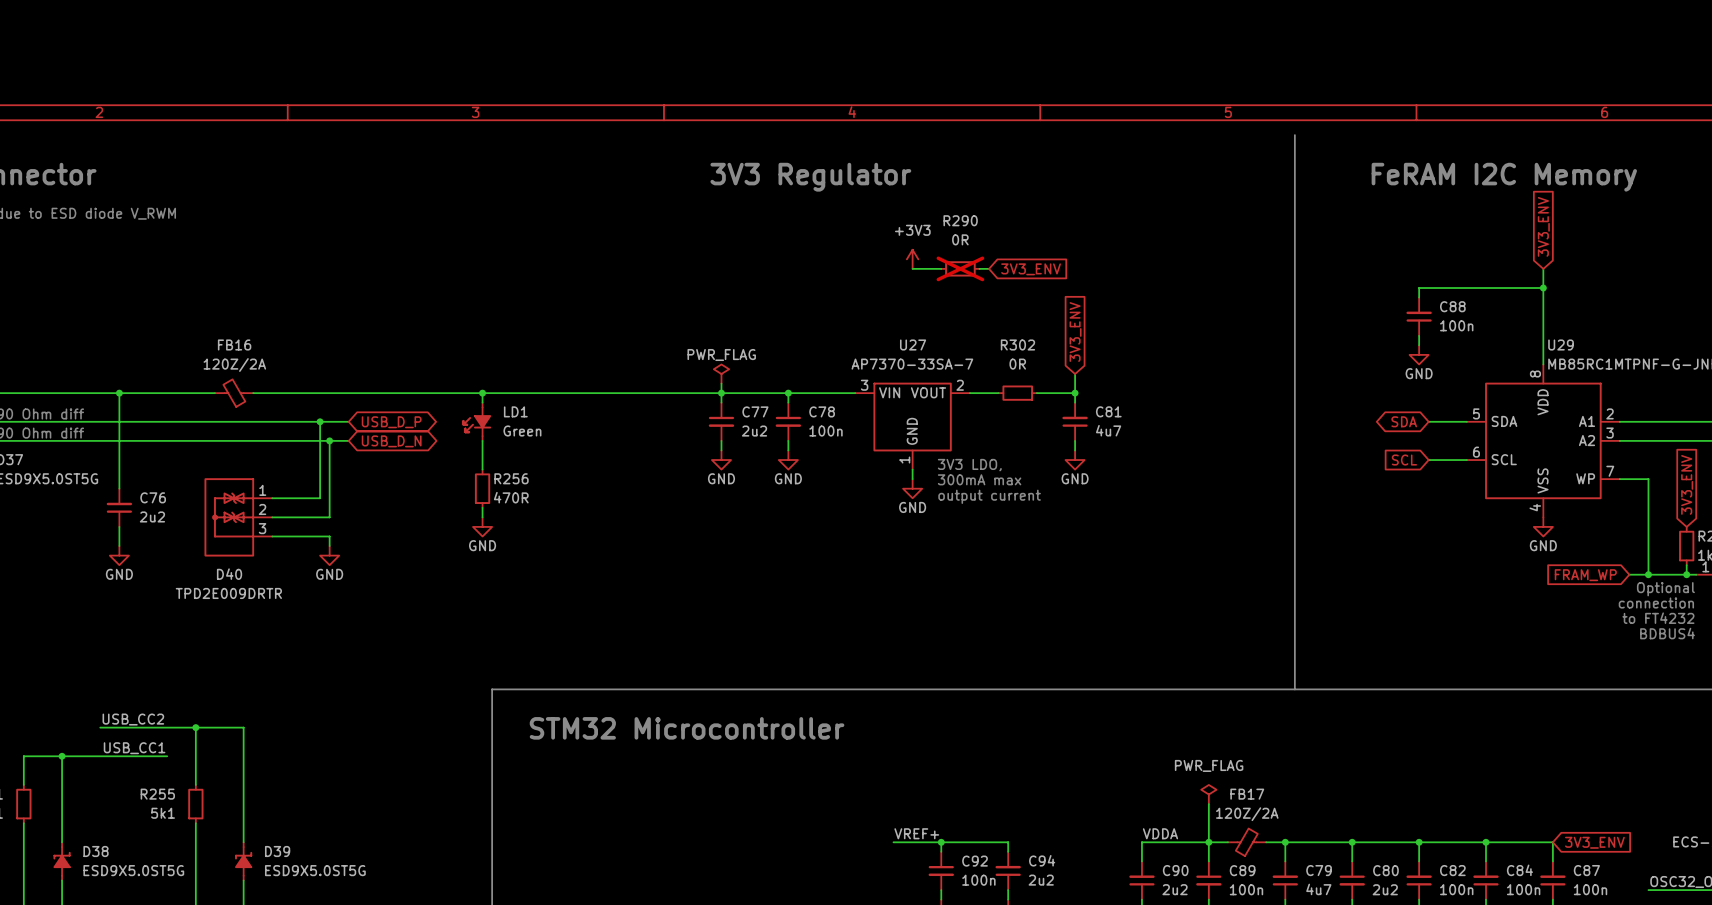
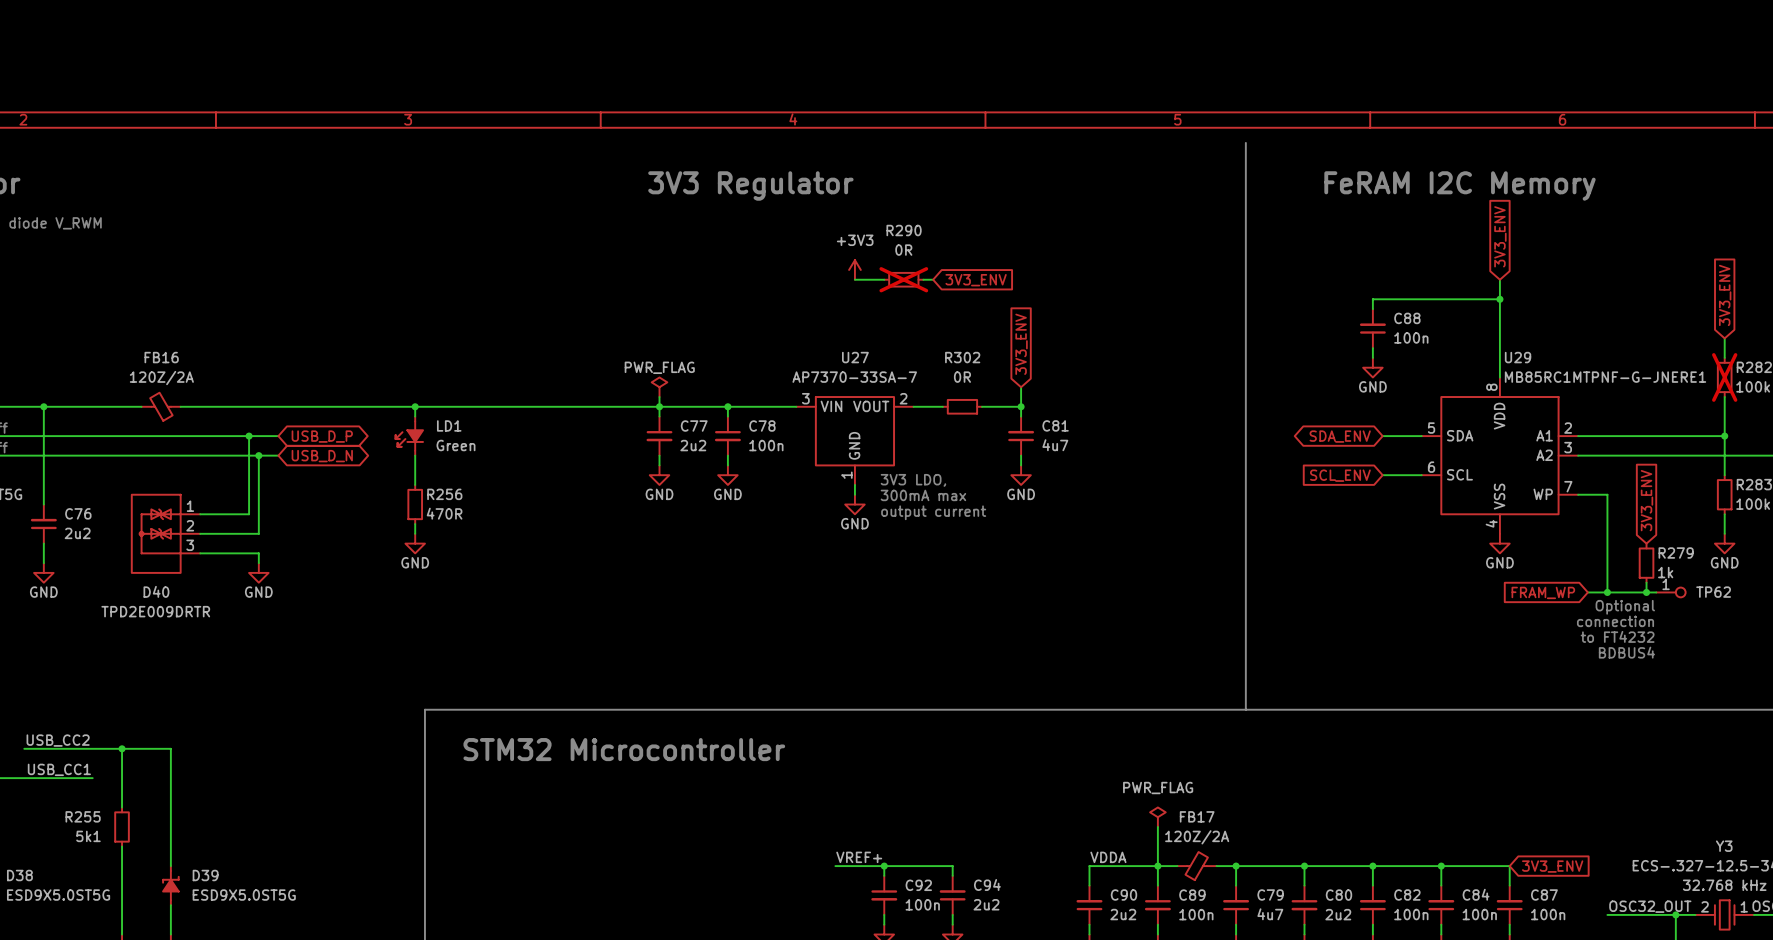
global label: SDA (1404, 421) -> SDA_ENV (1340, 436)
global label: SCL (1404, 460) -> SCL_ENV (1340, 475)

